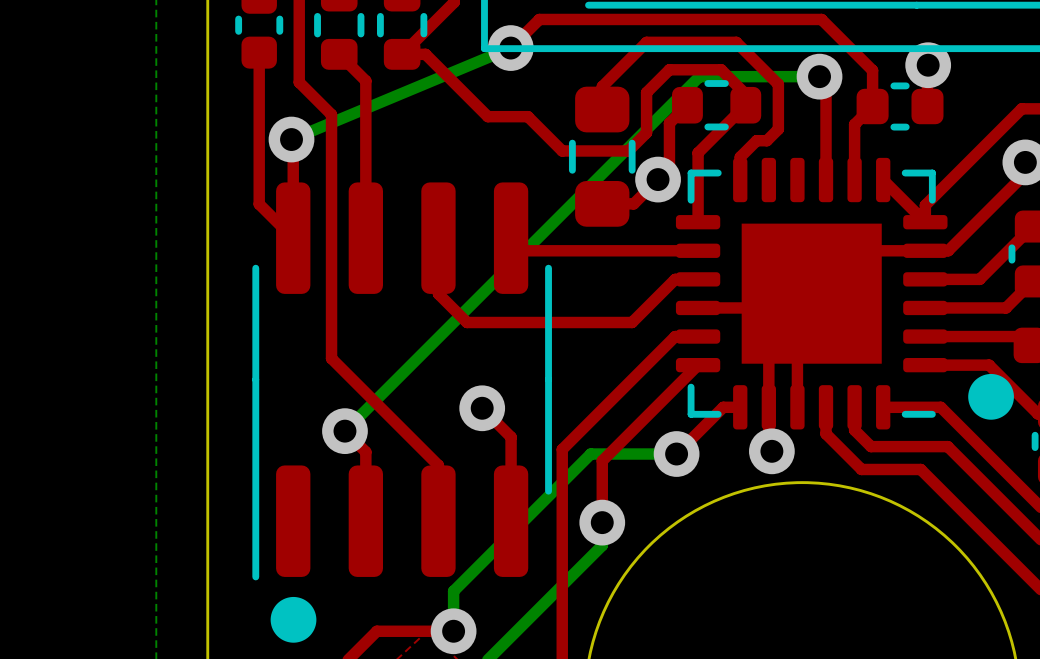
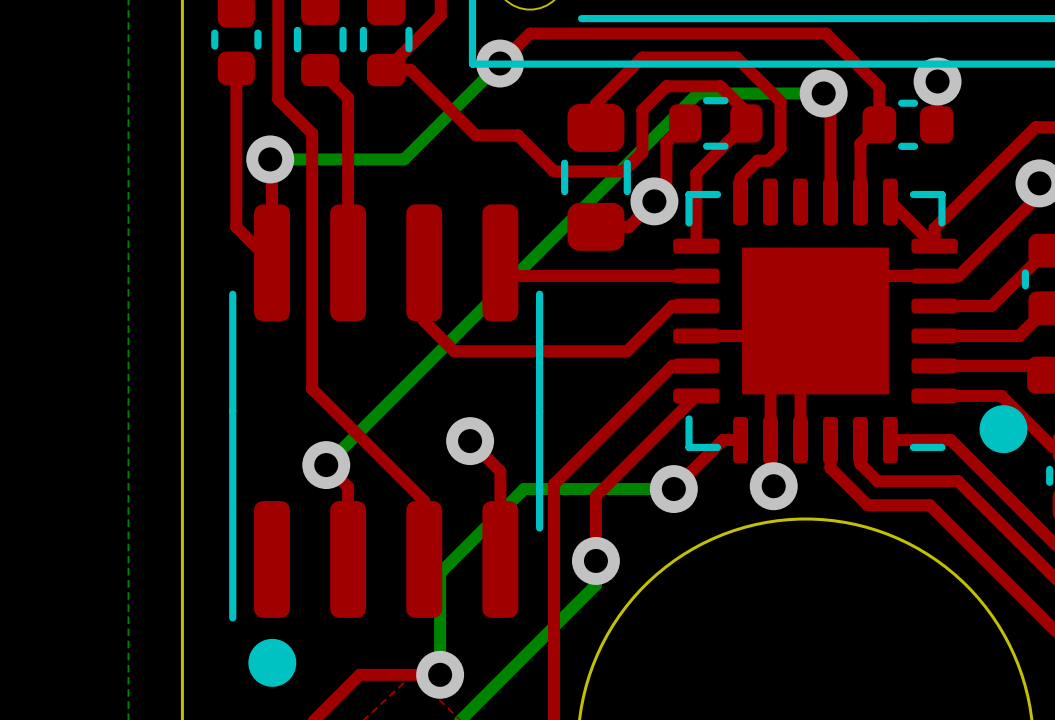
bottom track: (510, 48) (291, 139) -> (500, 63) (404, 159) (270, 159)
bottom track: (590, 454) (453, 591) -> (583, 489) (524, 489) (440, 572) (440, 632)

